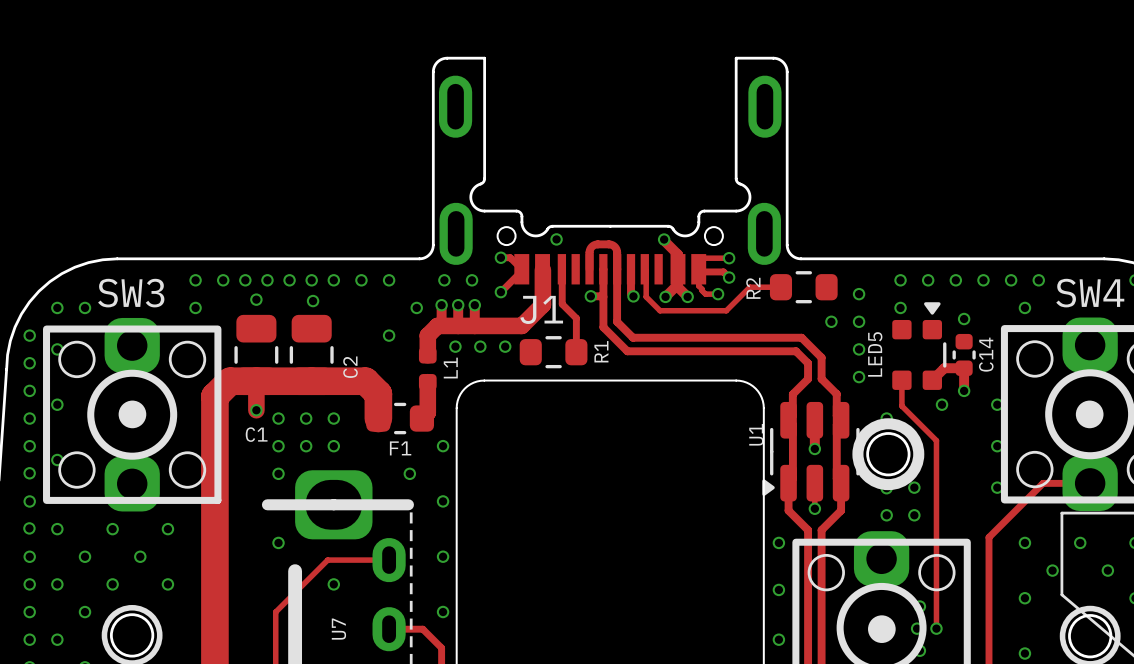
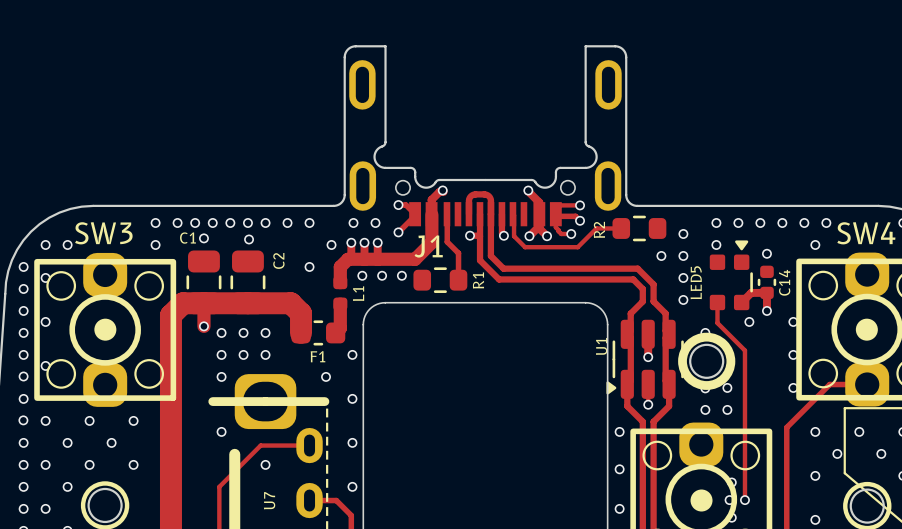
track: none -> (443, 191) (439, 191) (431, 199) (431, 214)
C2 name position: C2 (350, 367) -> C2 (278, 260)
C1 name position: C1 (256, 434) -> C1 (187, 238)

